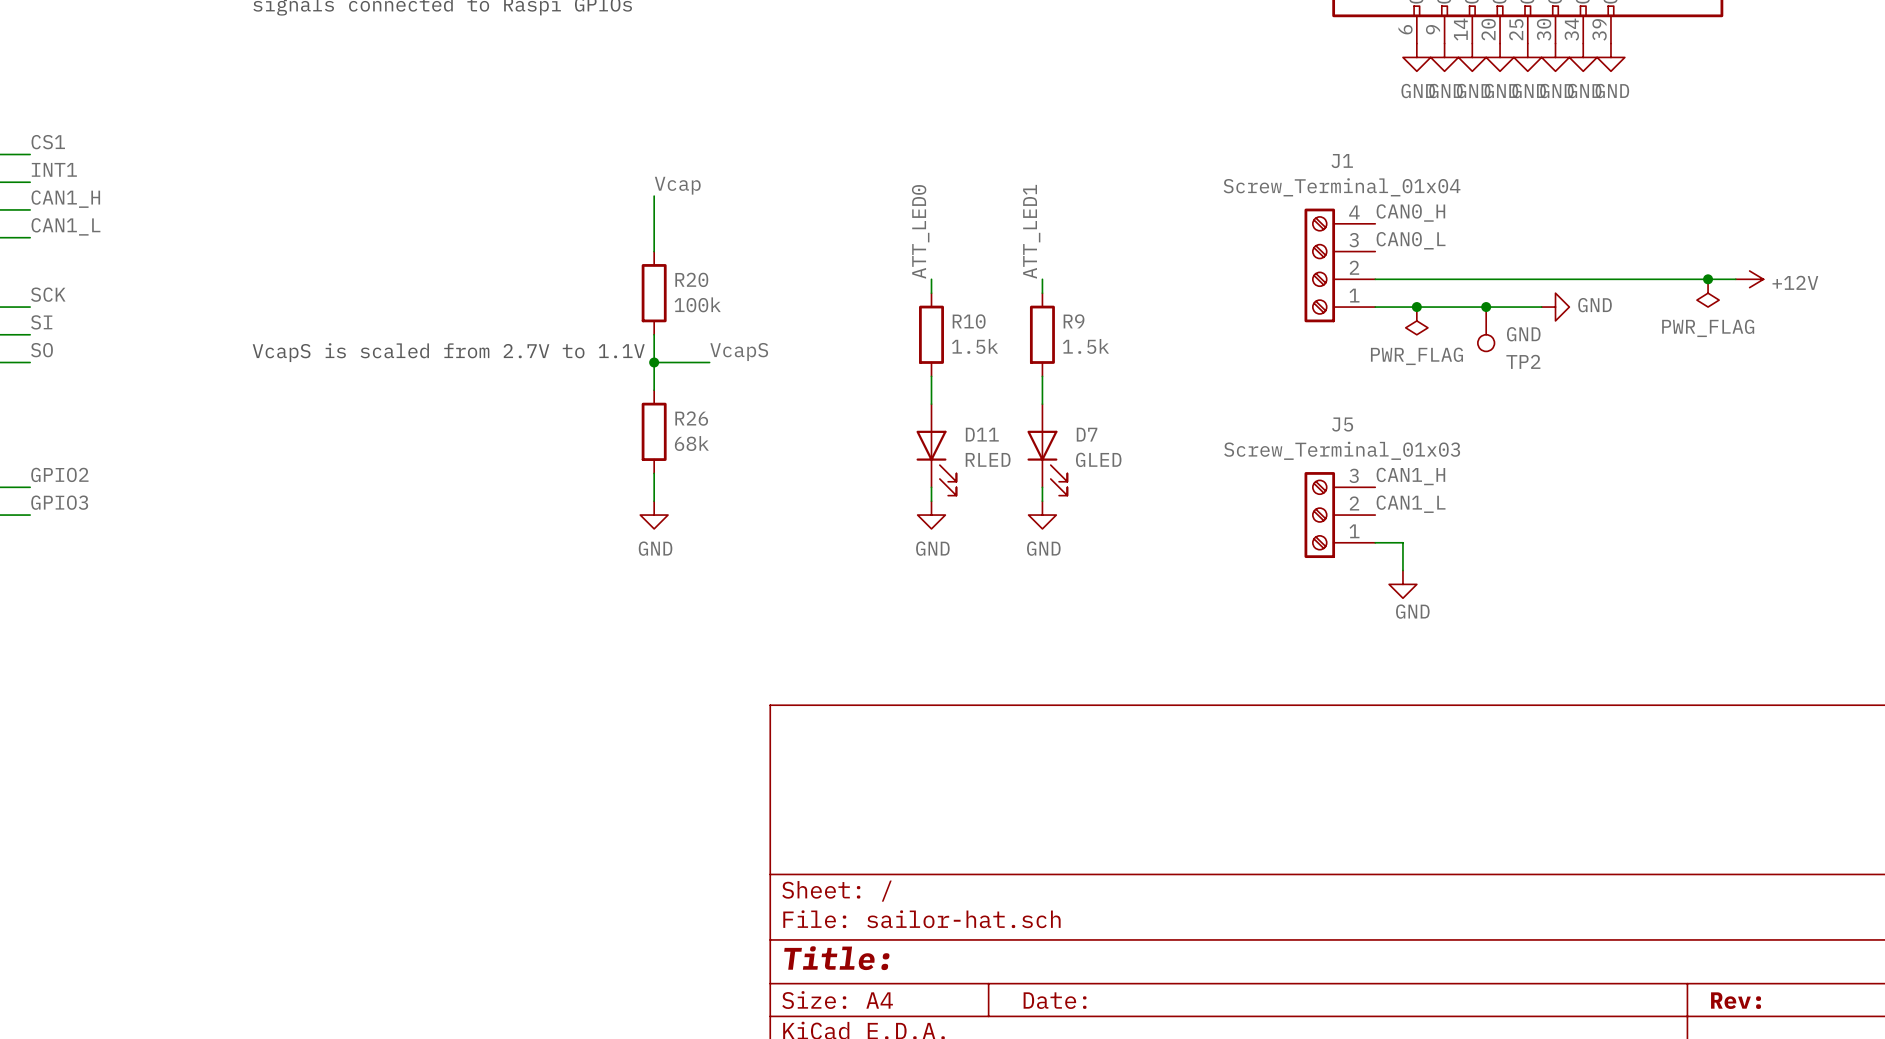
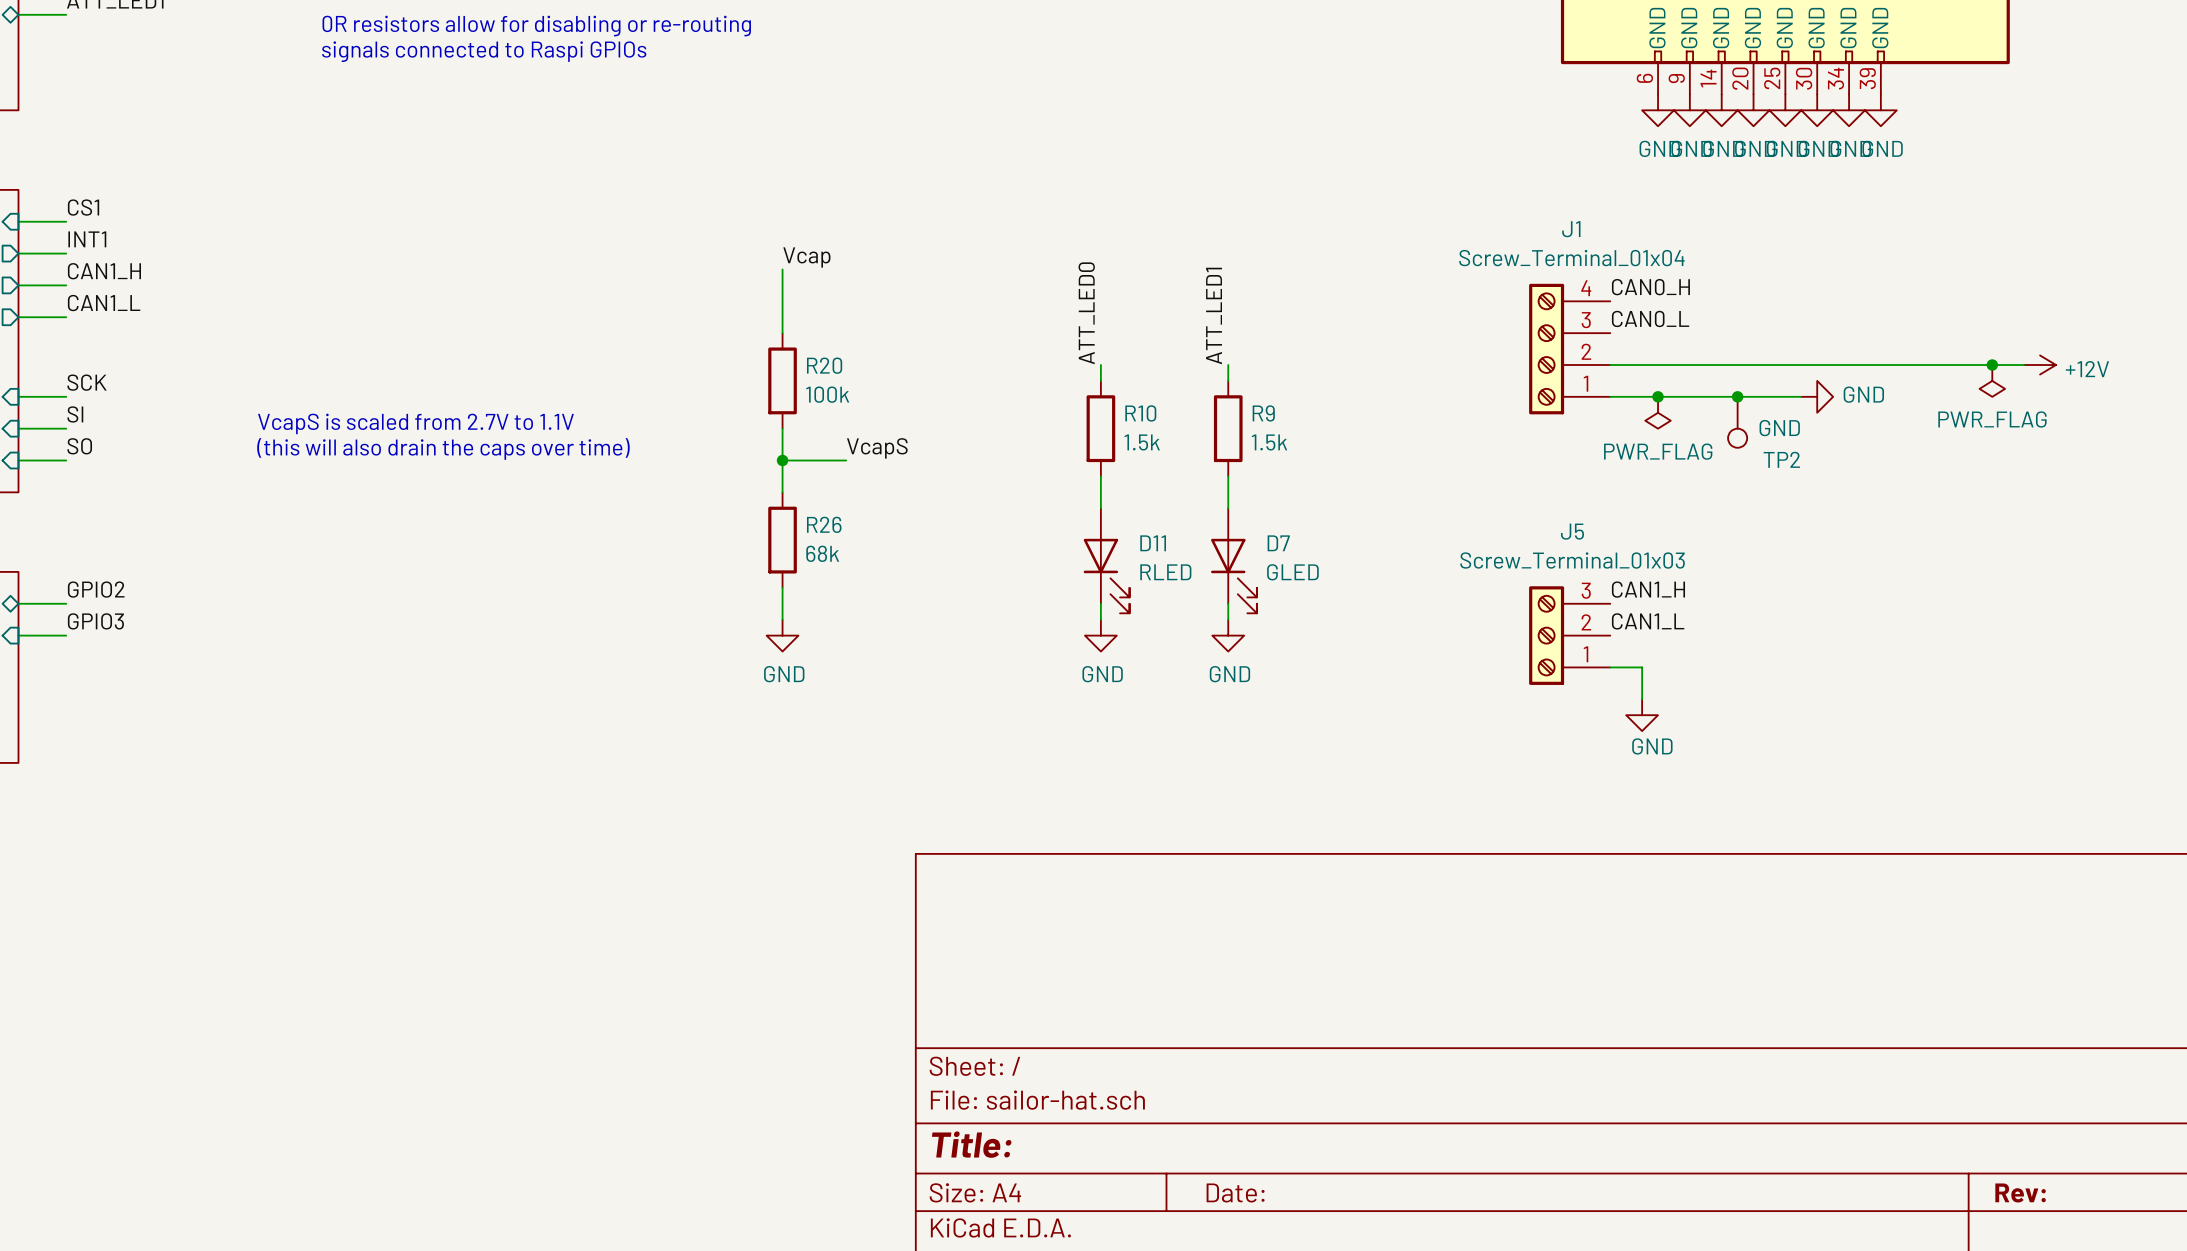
text: none -> (this will also drain the caps over time) (443, 448)
text position: VcapS is scaled from 2.7V to 1.1V (448, 352) -> VcapS is scaled from 2.7V to 1.1V (415, 423)

